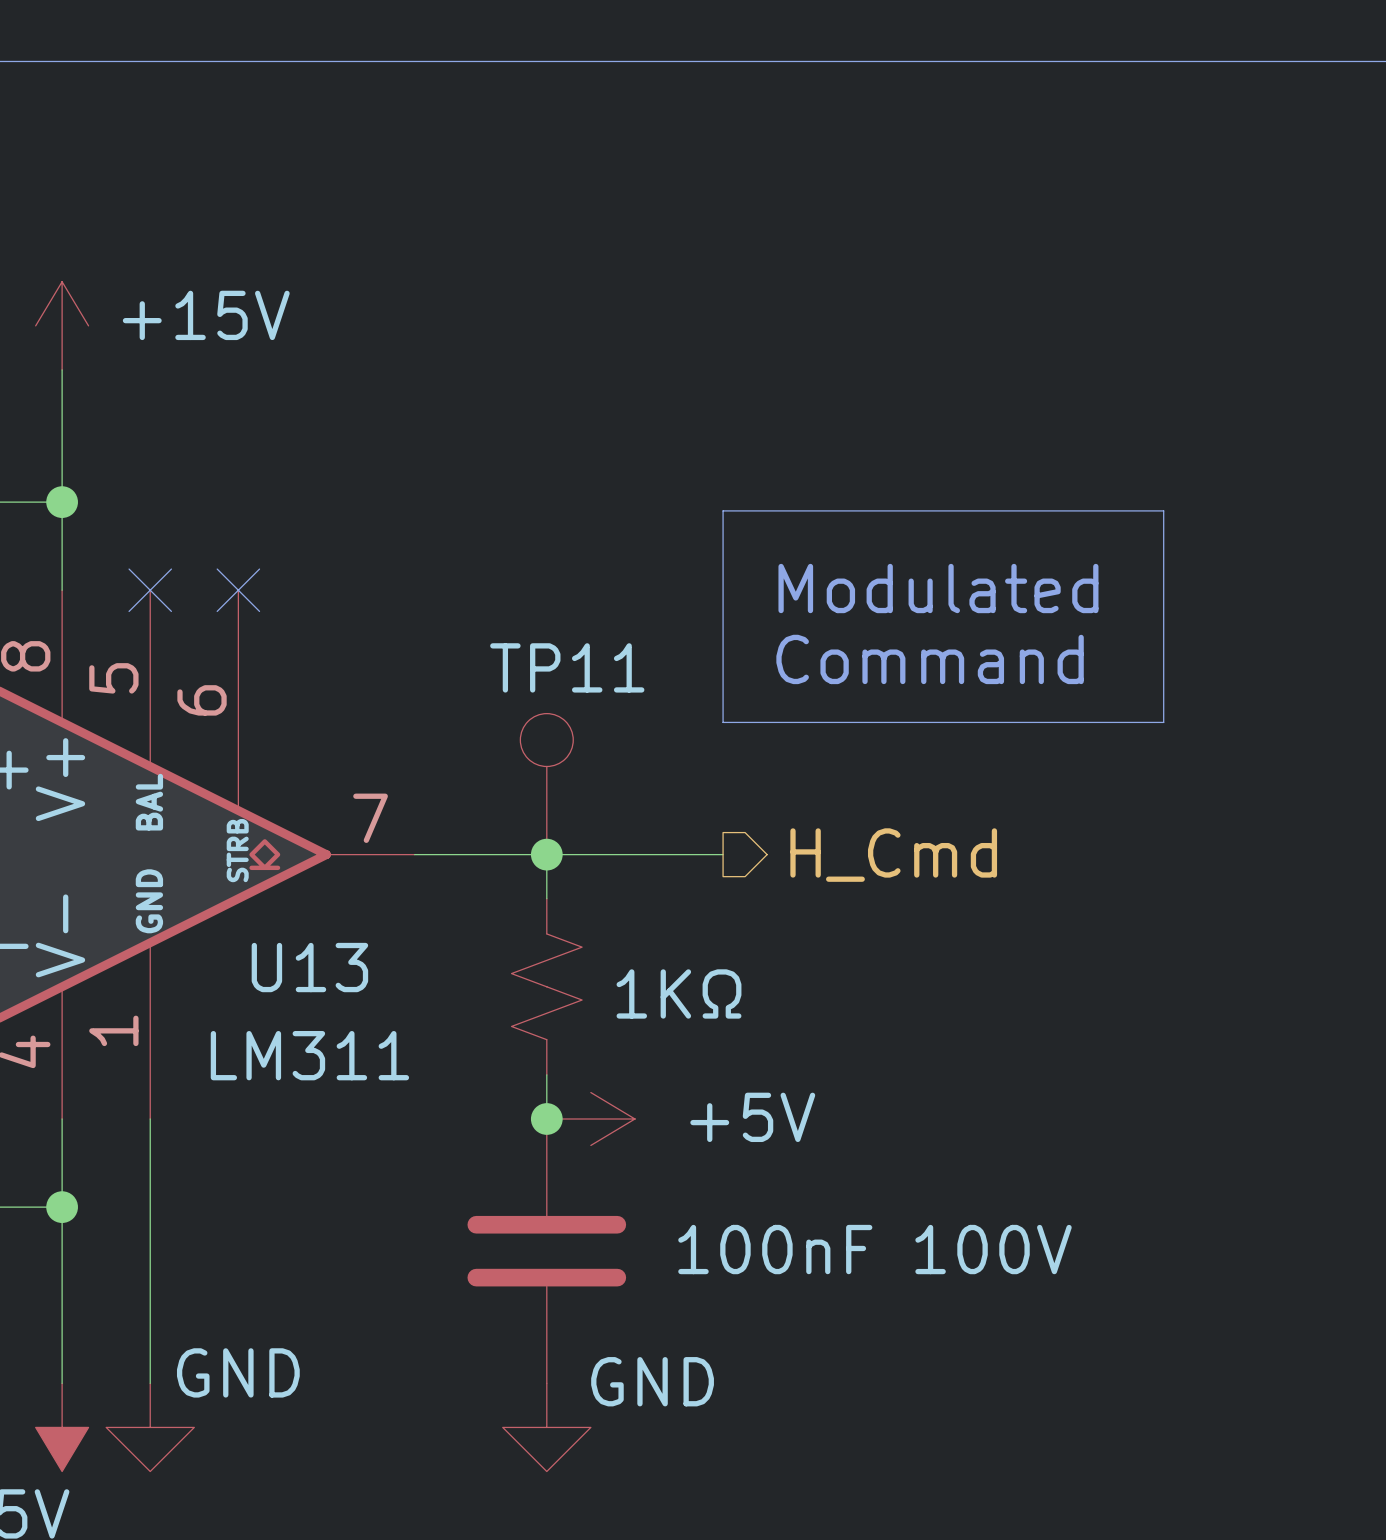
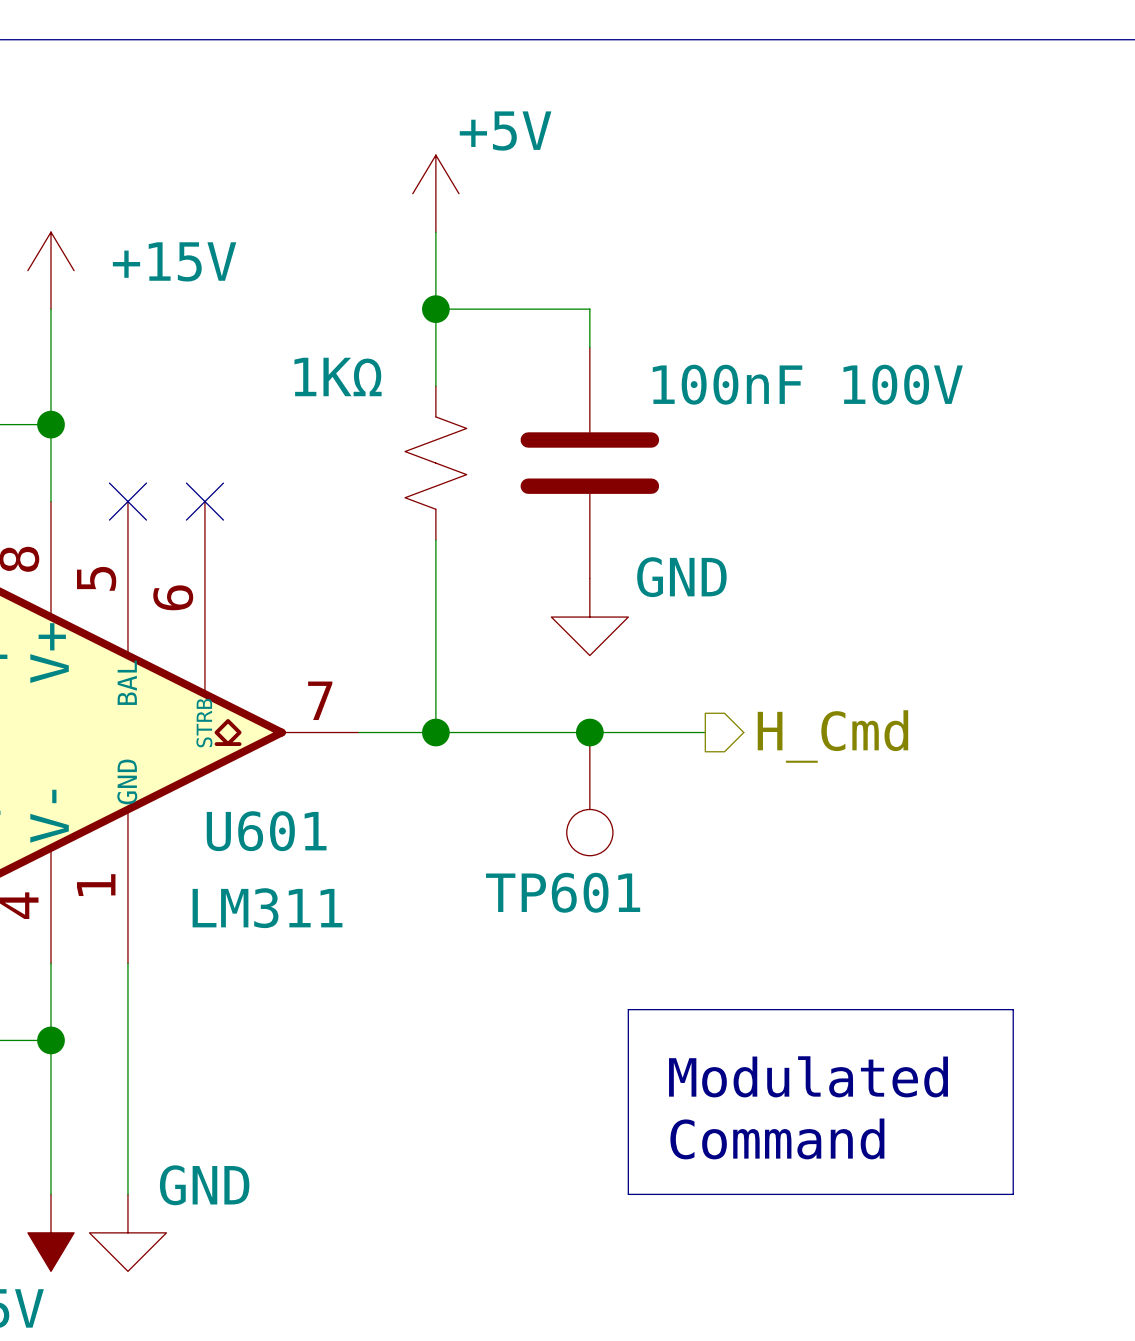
power symbol: none -> +5V (435, 193)
wire: none -> (435, 232) (435, 386)
wire: none -> (435, 309) (589, 309) (589, 347)
junction: none -> (435, 309)
line: (723, 510) (1163, 510) (1163, 722) (723, 722) (723, 510) -> (628, 1009) (1013, 1009) (1013, 1194) (628, 1194) (628, 1009)
text position: Modulated (938, 588) -> Modulated (808, 1076)
wire: none -> (435, 540) (435, 732)
text position: Command (930, 659) -> Command (777, 1138)
TP11: (546, 784) -> none
wire: (546, 854) (546, 898) -> none
junction position: (546, 854) -> (435, 732)
junction: none -> (589, 732)
wire: none -> (628, 732) (705, 732)
hierarchical label position: H_Cmd (893, 855) -> H_Cmd (832, 736)
TP601: none -> (589, 794)
U13 name: U13 (309, 967) -> U601 (266, 831)
part position: (546, 986) -> (435, 463)
part value position: 1KΩ (678, 993) -> 1KΩ (338, 376)
wire: (546, 1074) (546, 1118) -> none
junction: (546, 1118) -> none
power symbol: +5V (590, 1118) -> none
part value position: 100nF 100V (874, 1249) -> 100nF 100V (807, 384)
part position: (546, 1251) -> (589, 463)
power symbol position: GND (546, 1427) -> GND (589, 617)

